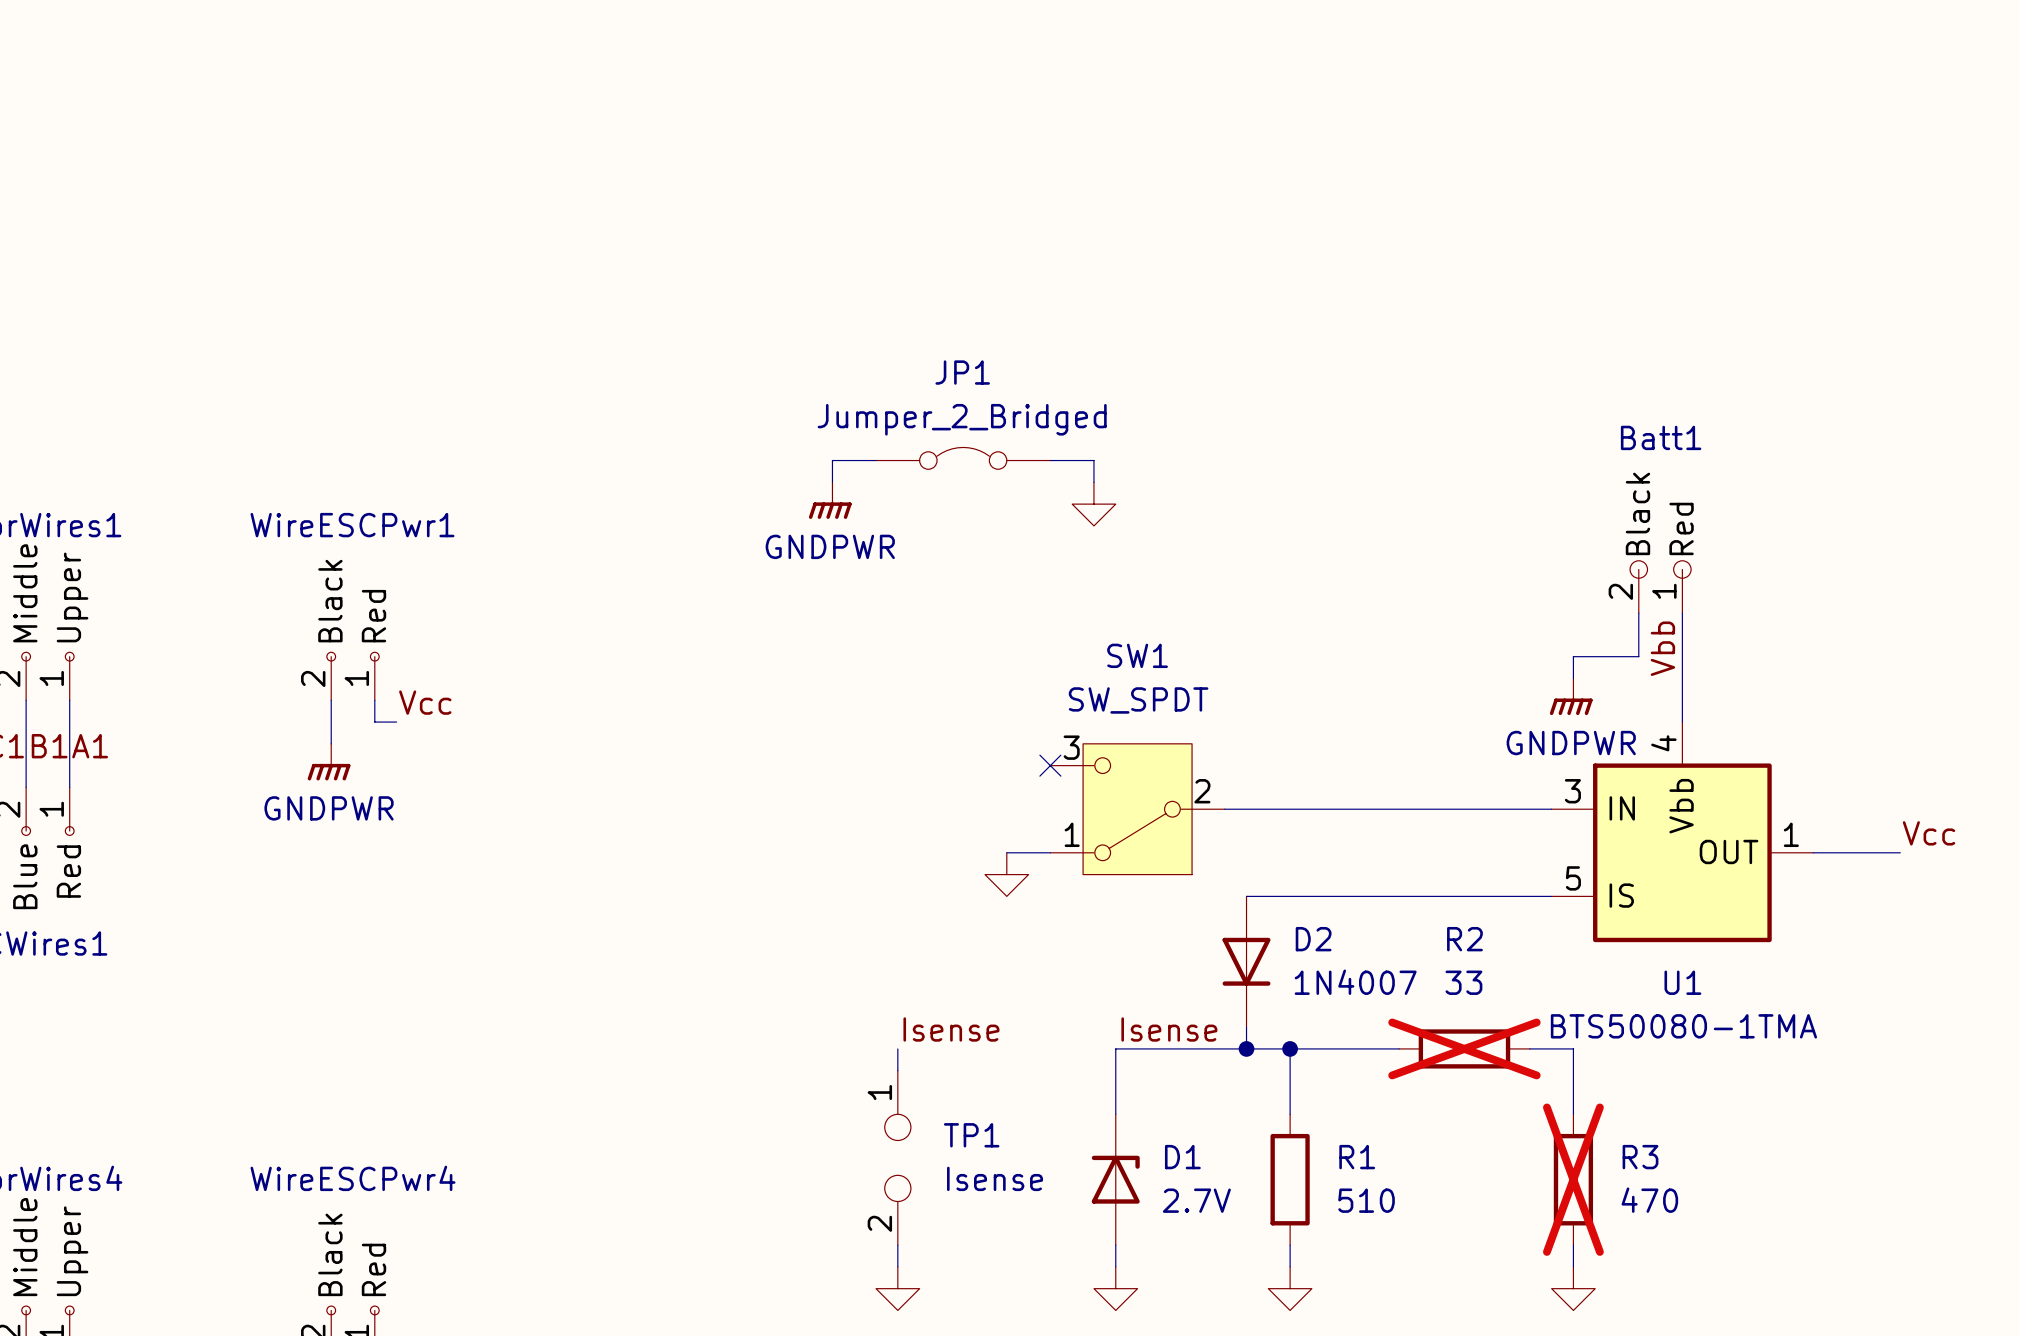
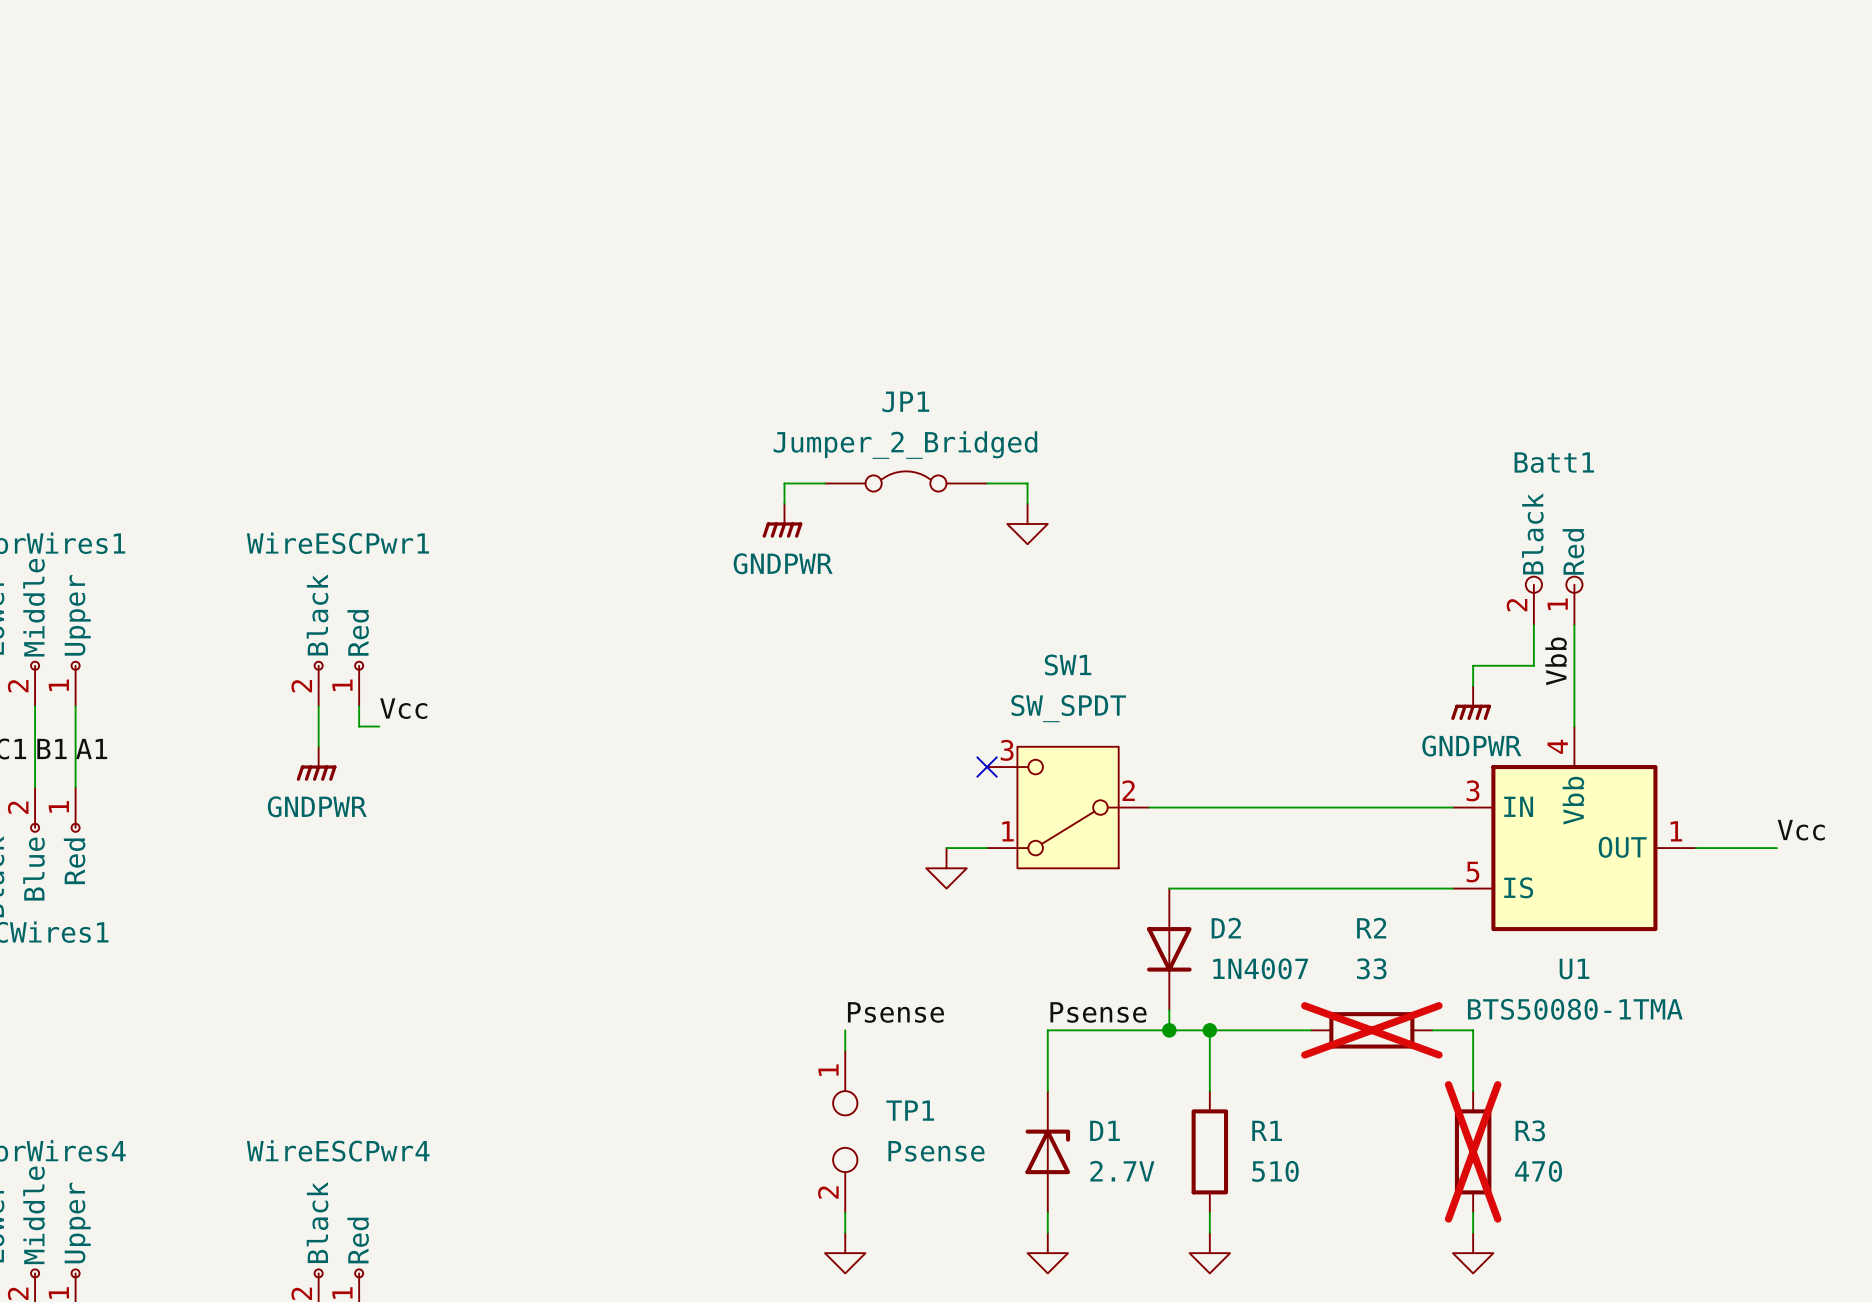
label: Isense (951, 1029) -> Psense (895, 1012)
label: Isense (1169, 1029) -> Psense (1098, 1012)
TP1 value: Isense (995, 1178) -> Psense (936, 1151)

